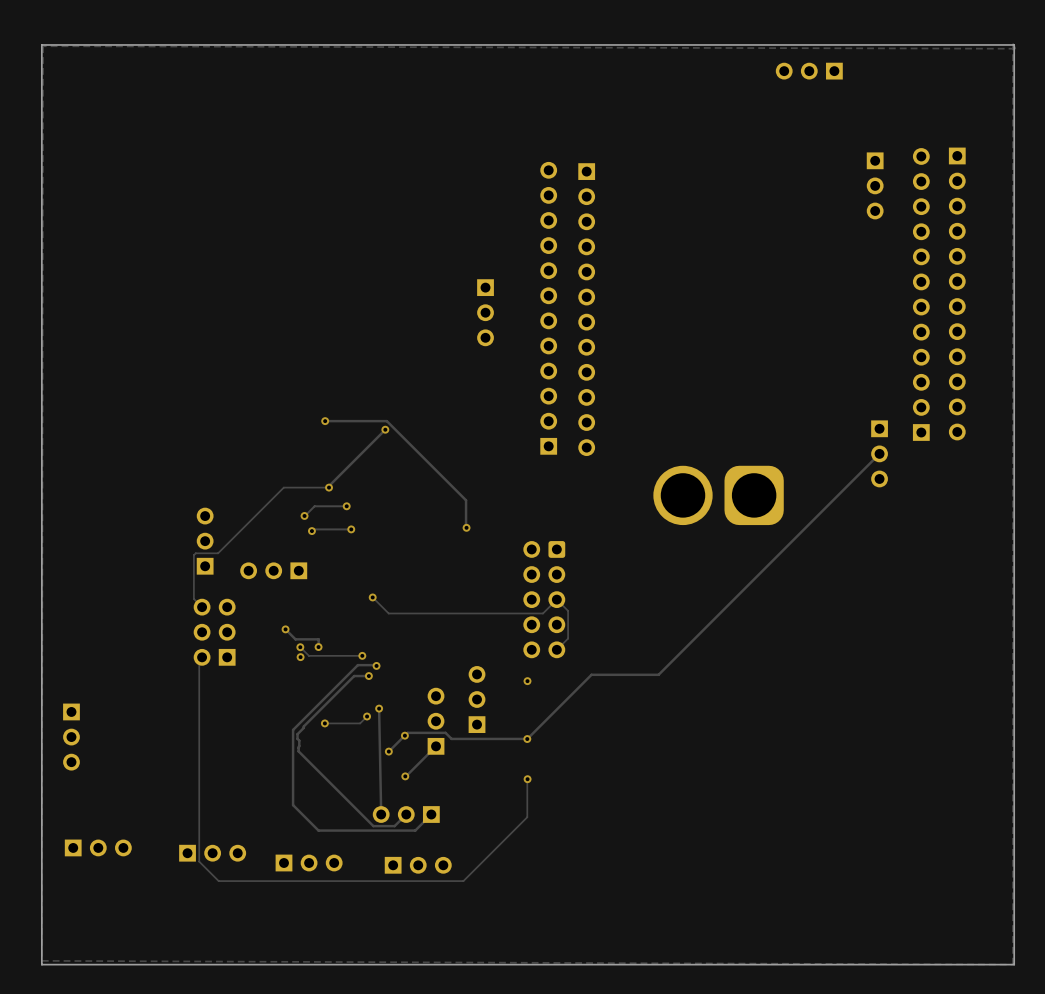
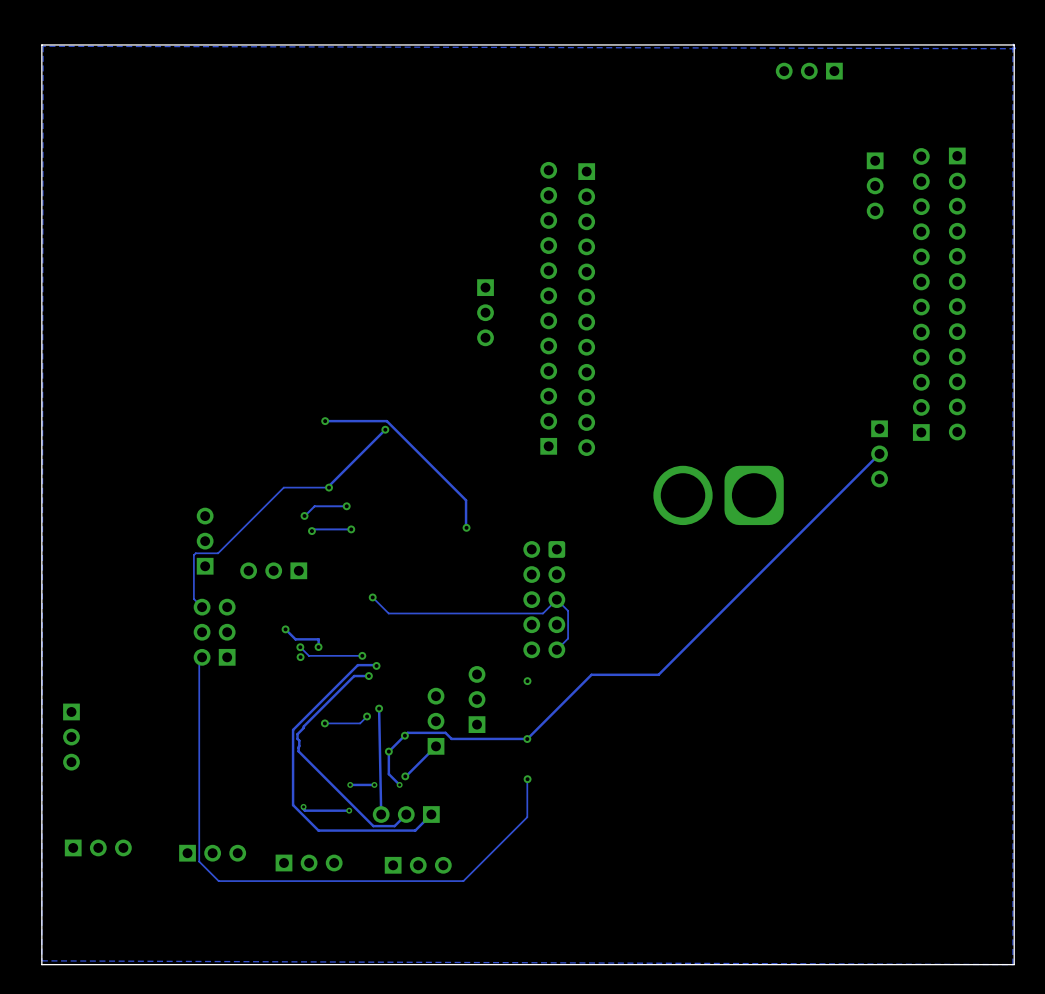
track: none -> (388, 751) (388, 774) (399, 784)
via: none -> (350, 784)
track: none -> (374, 784) (350, 784)
via: none -> (374, 784)
via: none -> (399, 784)
track: none -> (303, 806) (302, 808) (304, 810) (349, 810)
via: none -> (303, 806)
via: none -> (349, 810)

